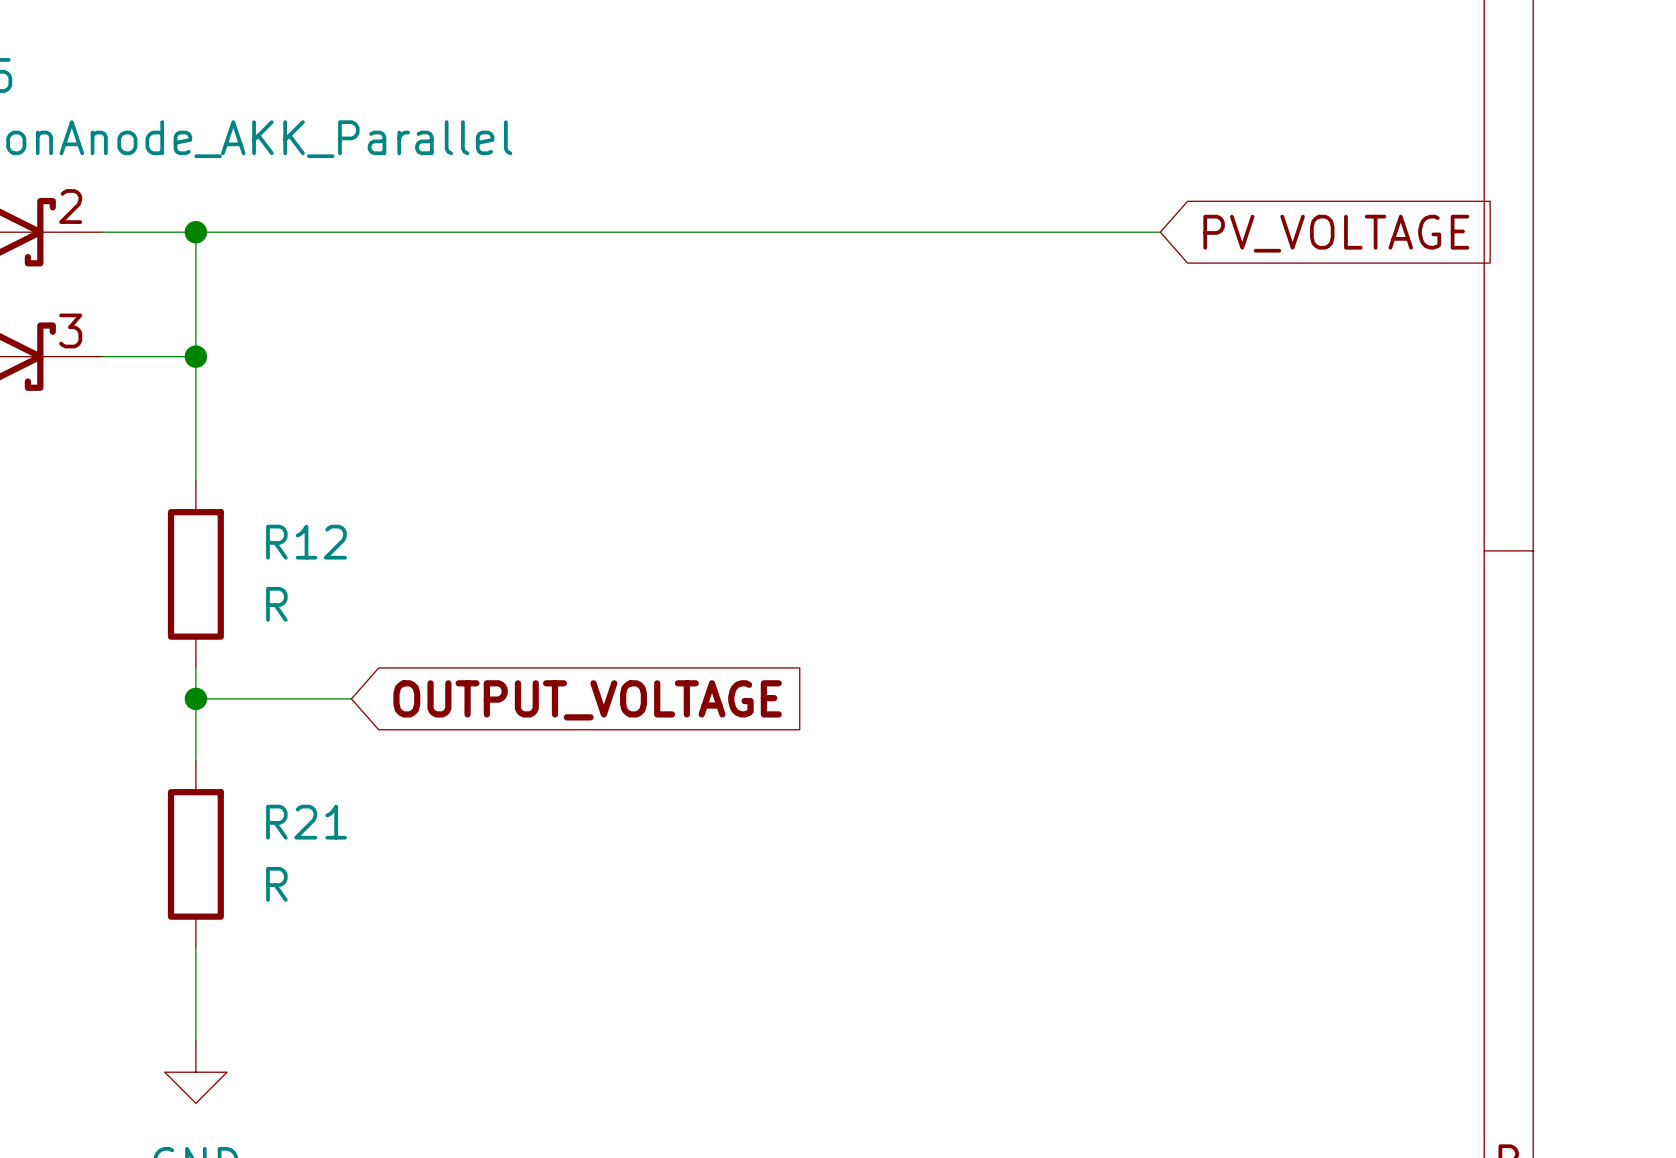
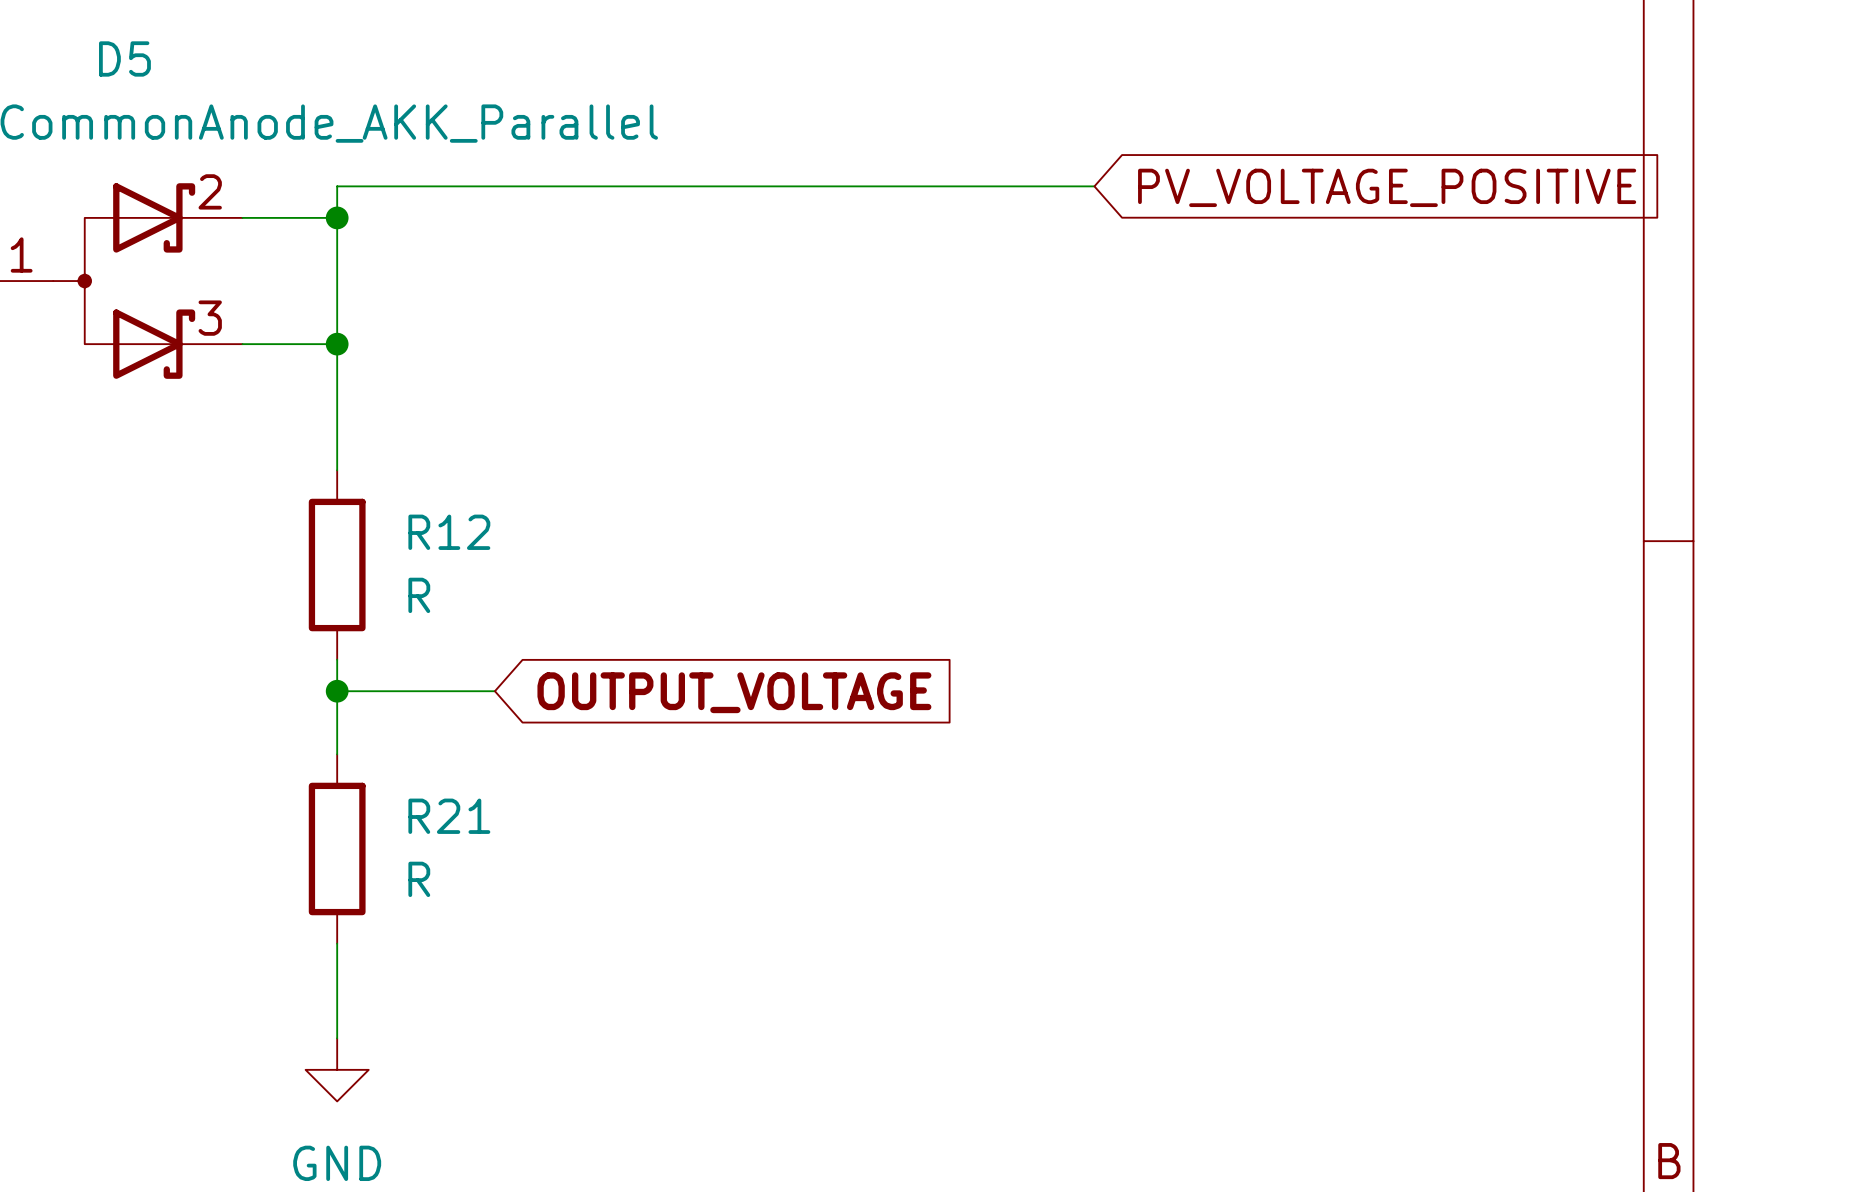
wire: (195, 232) (1160, 232) -> (337, 217) (337, 186) (1094, 186)
global label: PV_VOLTAGE (1336, 233) -> PV_VOLTAGE_POSITIVE (1387, 187)

